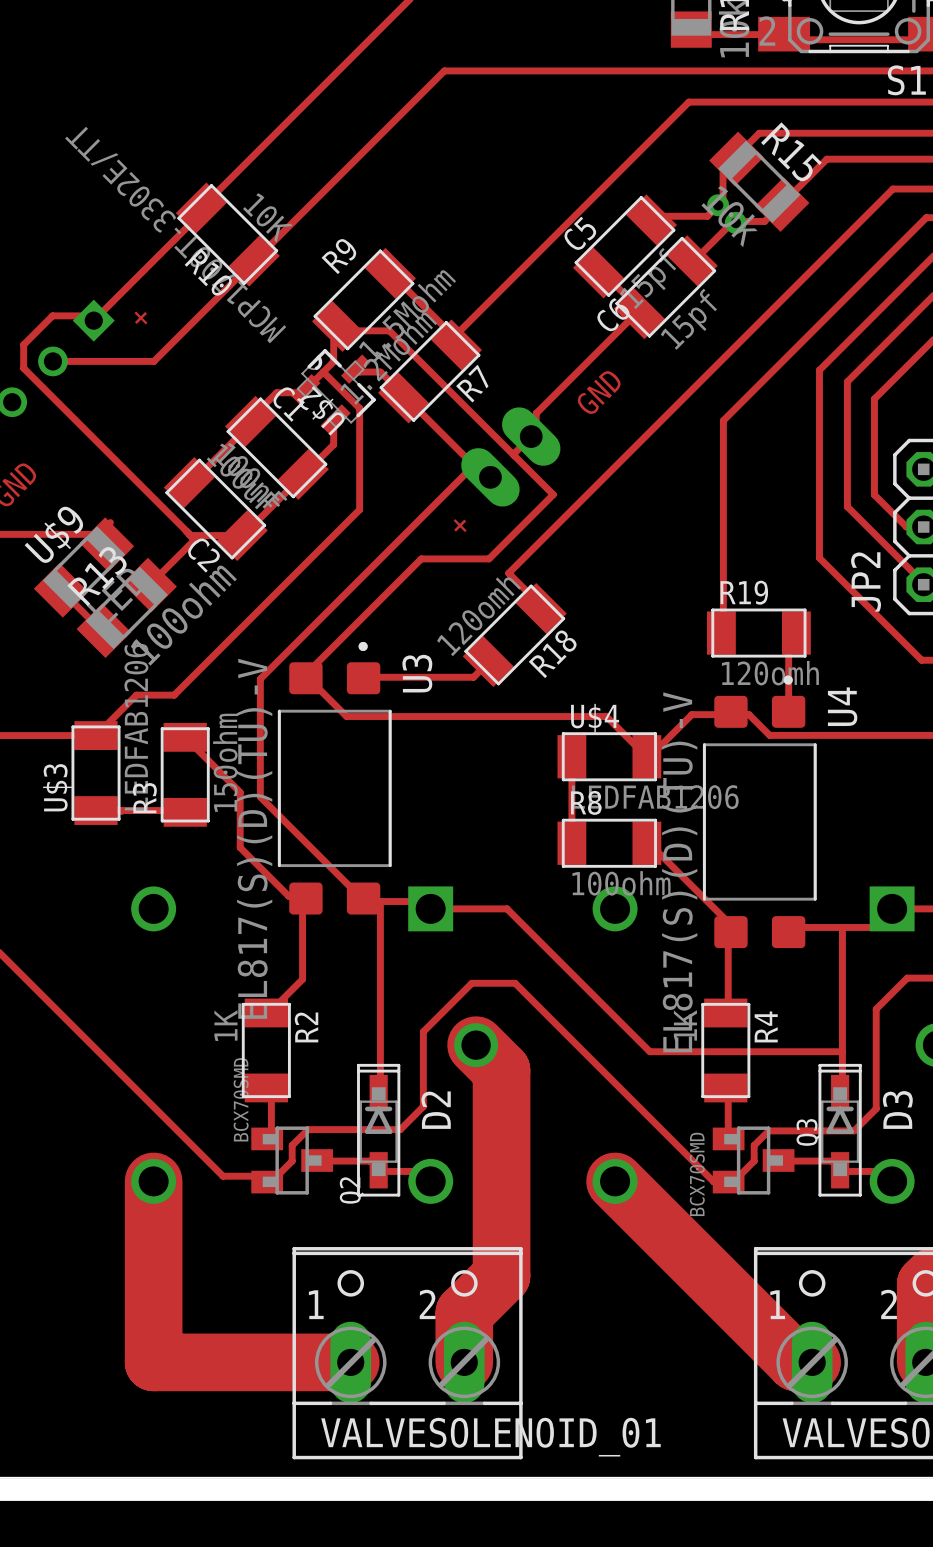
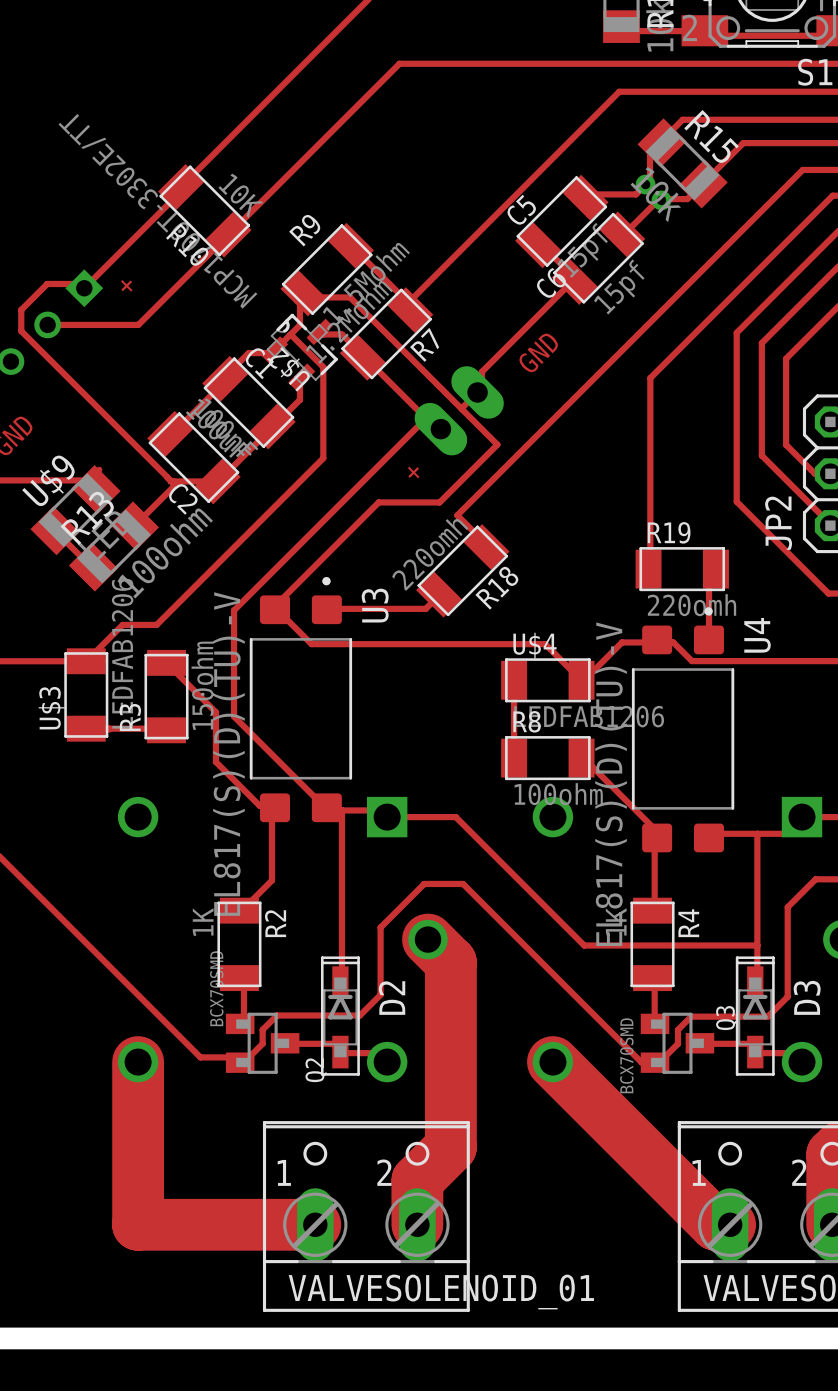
R18 value: 120omh (479, 616) -> 220omh (430, 554)
R19 value: 120omh (770, 673) -> 220omh (692, 605)

